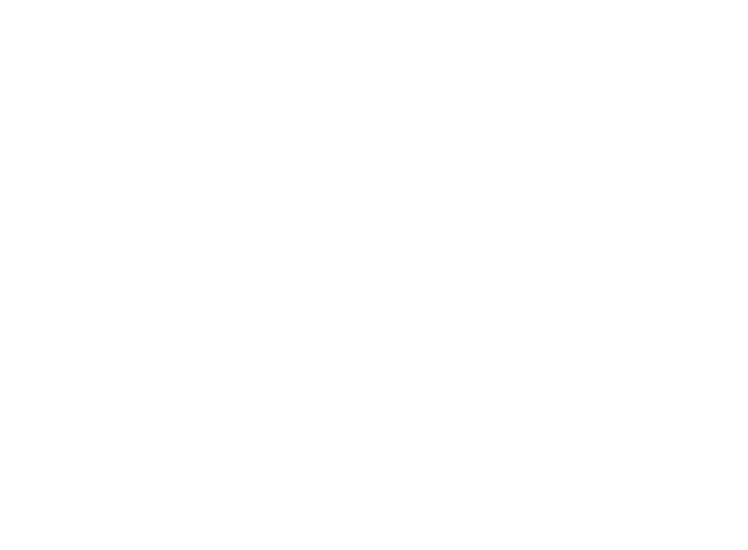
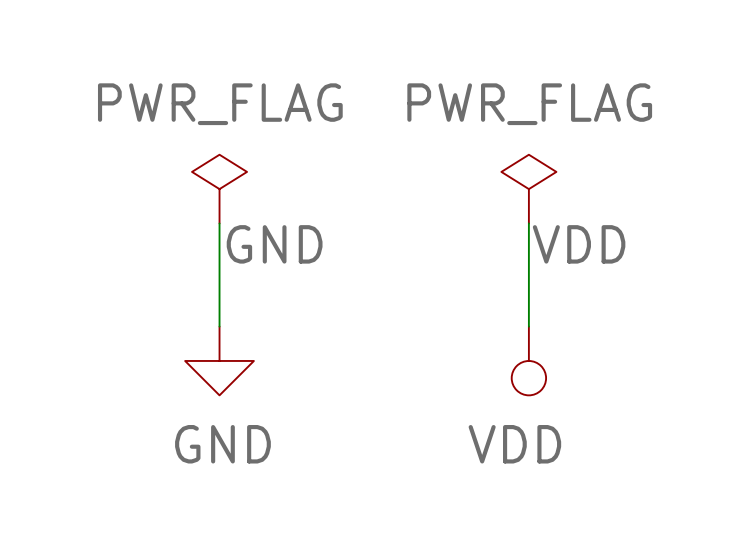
power symbol: none -> PWR_FLAG (219, 189)
power symbol: none -> PWR_FLAG (528, 189)
wire: none -> (219, 223) (219, 326)
wire: none -> (528, 223) (528, 326)
label: none -> GND (274, 244)
label: none -> VDD (579, 244)
power symbol: none -> GND (219, 360)
power symbol: none -> VDD (528, 360)

